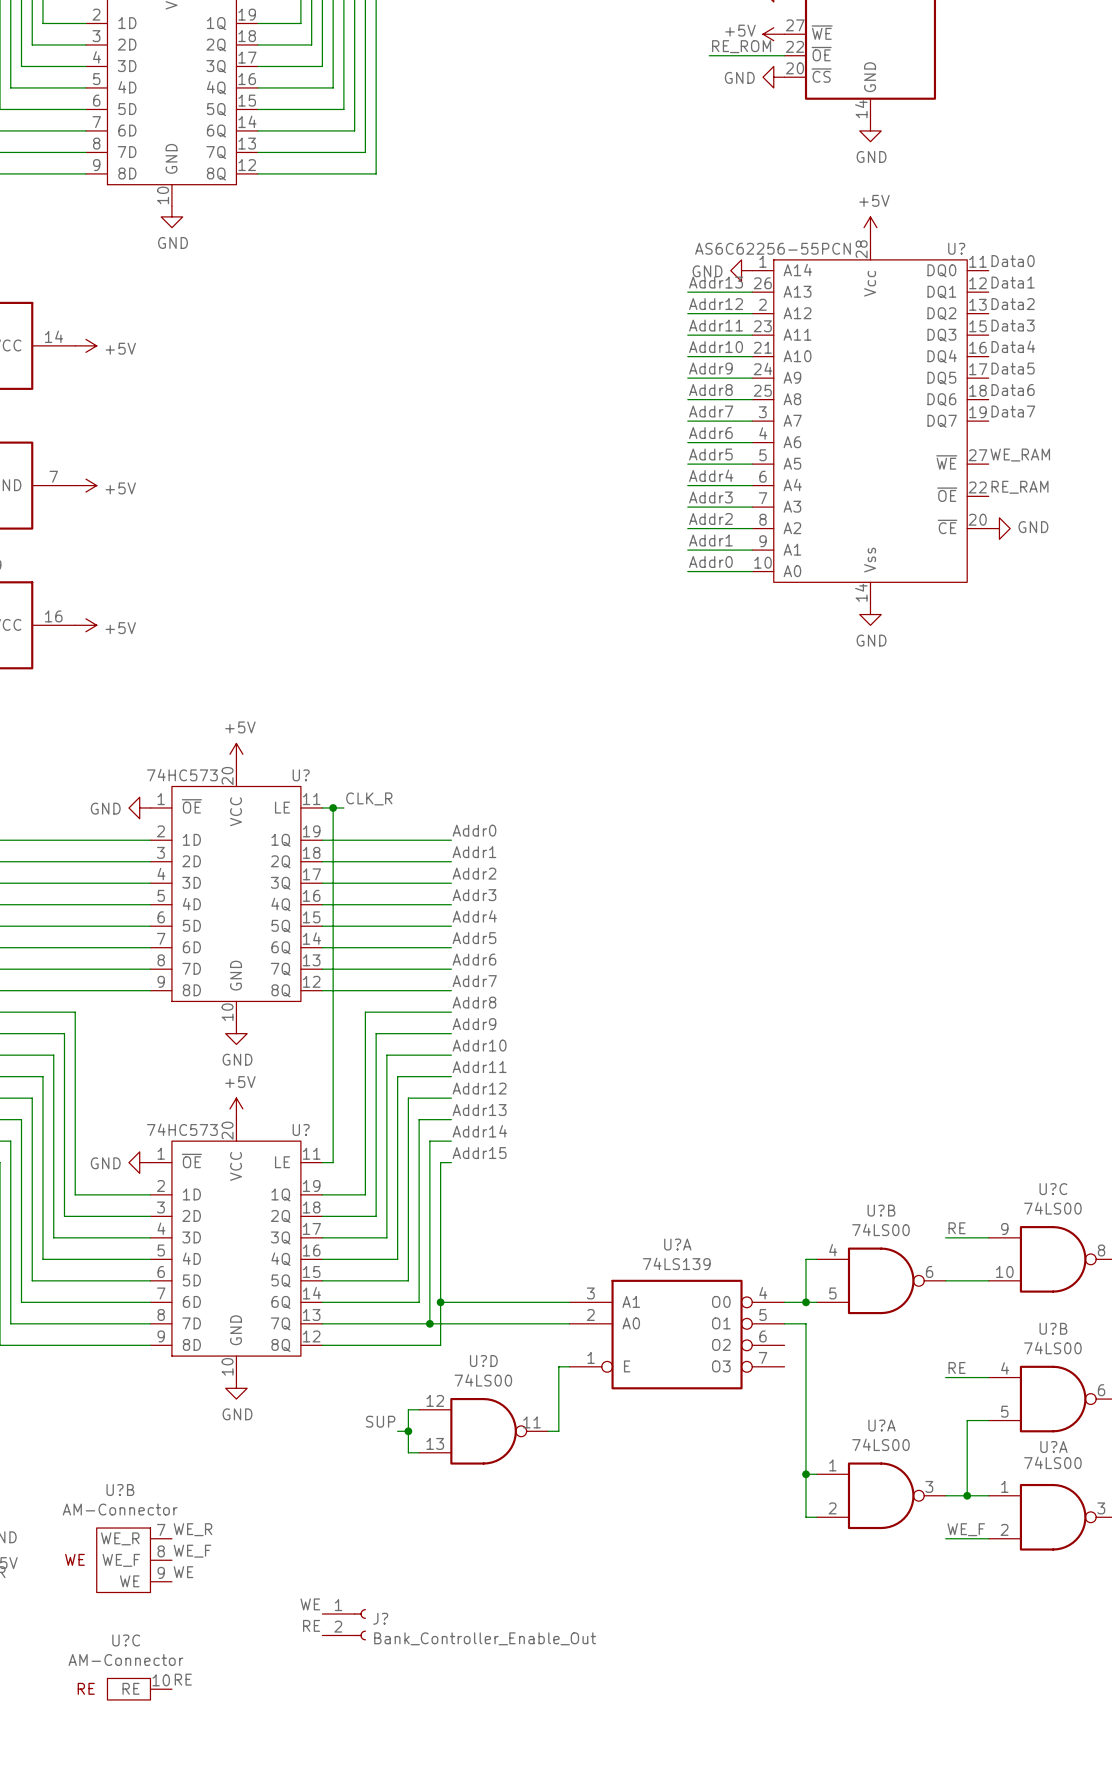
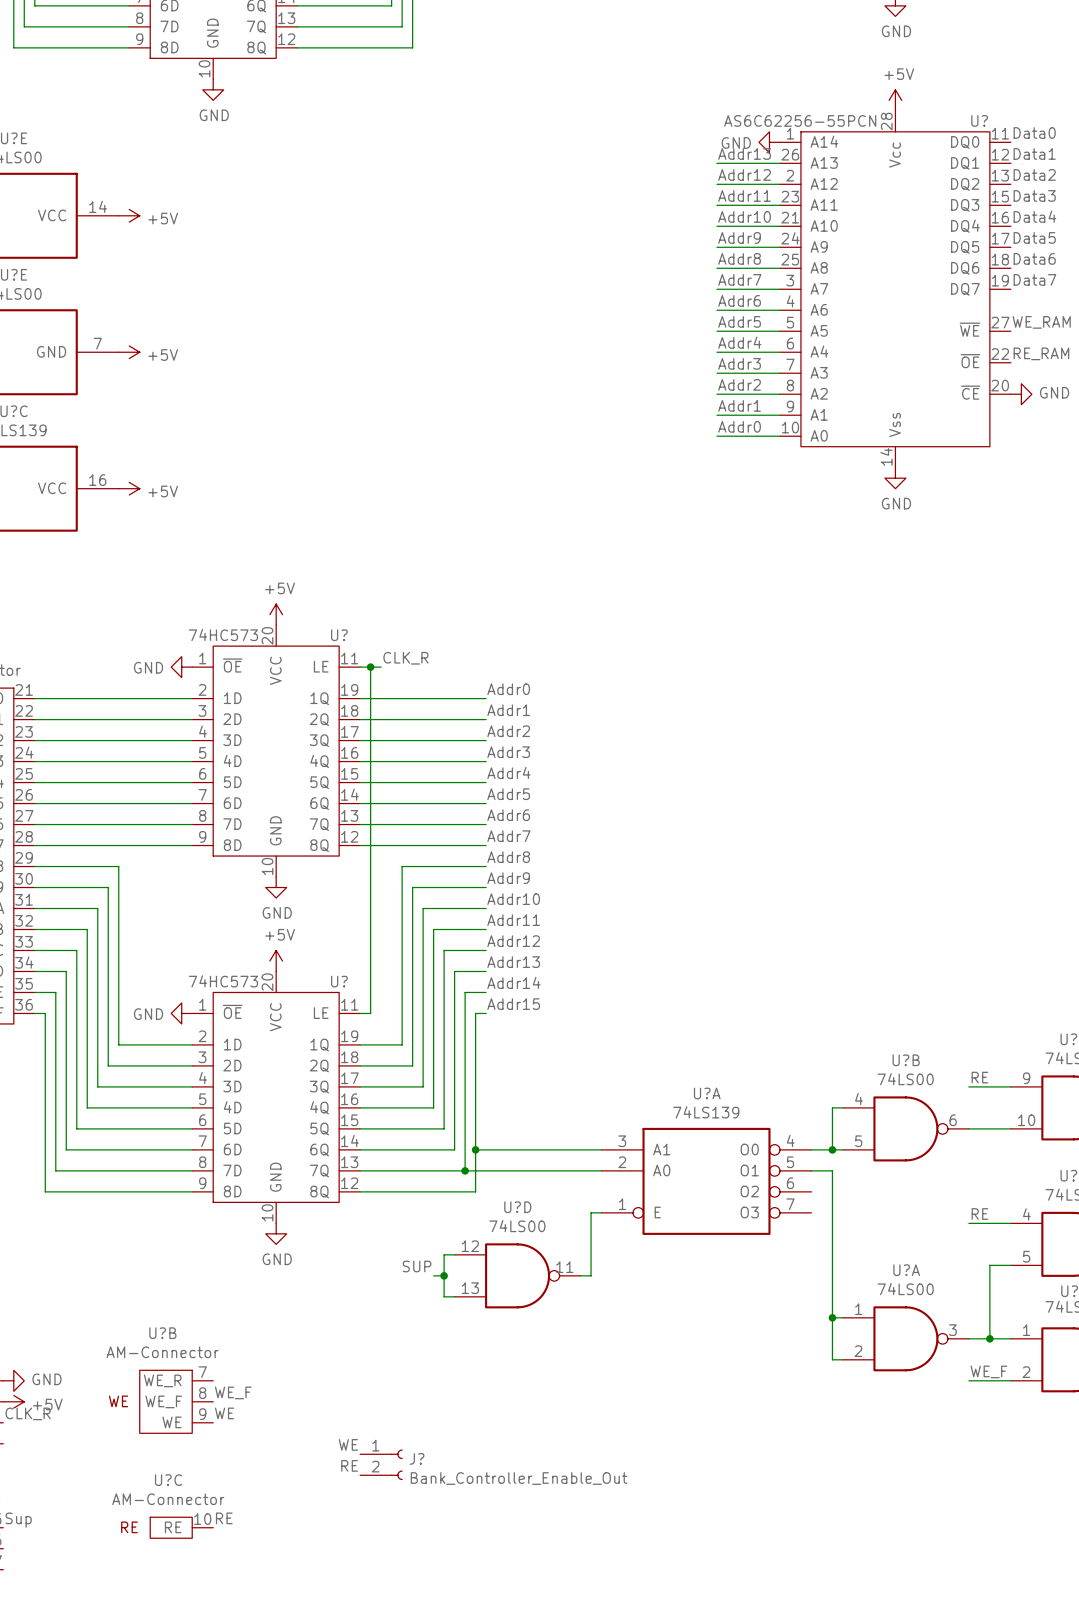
label: WE_R (193, 1529) -> none

